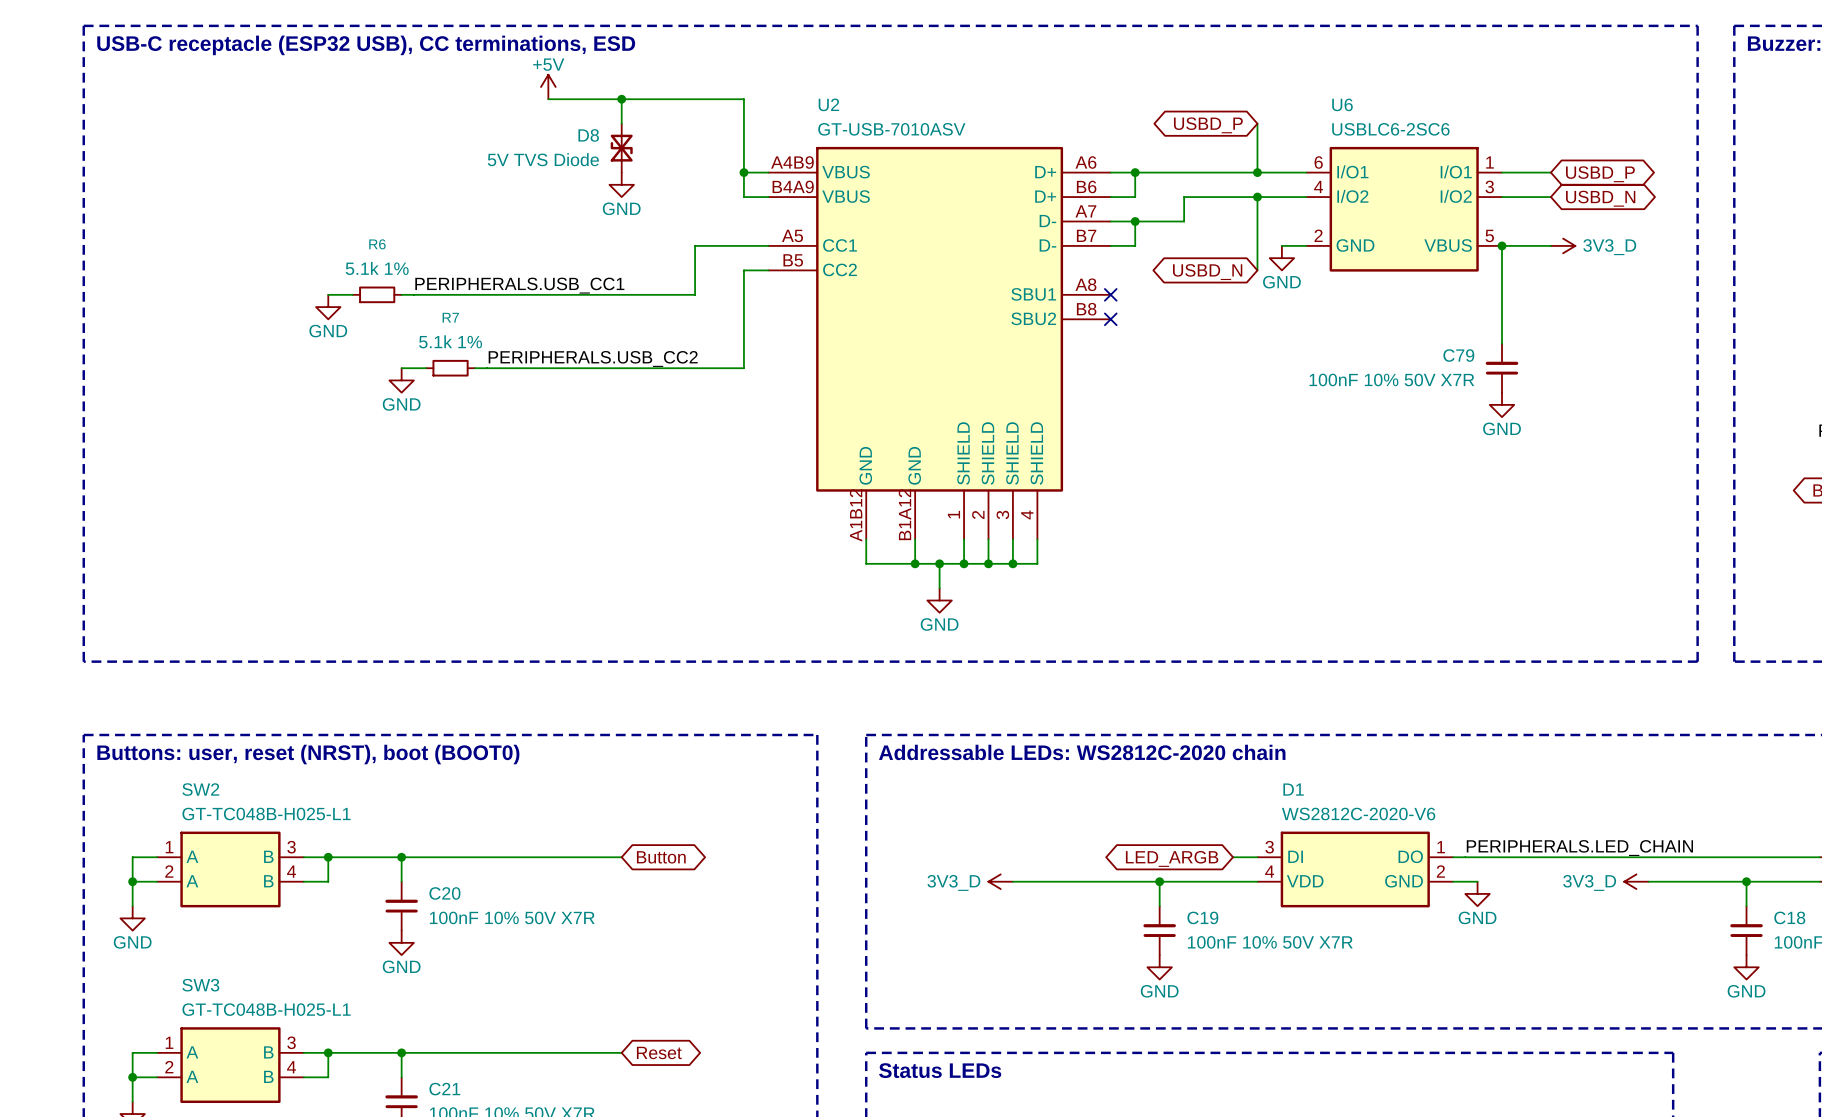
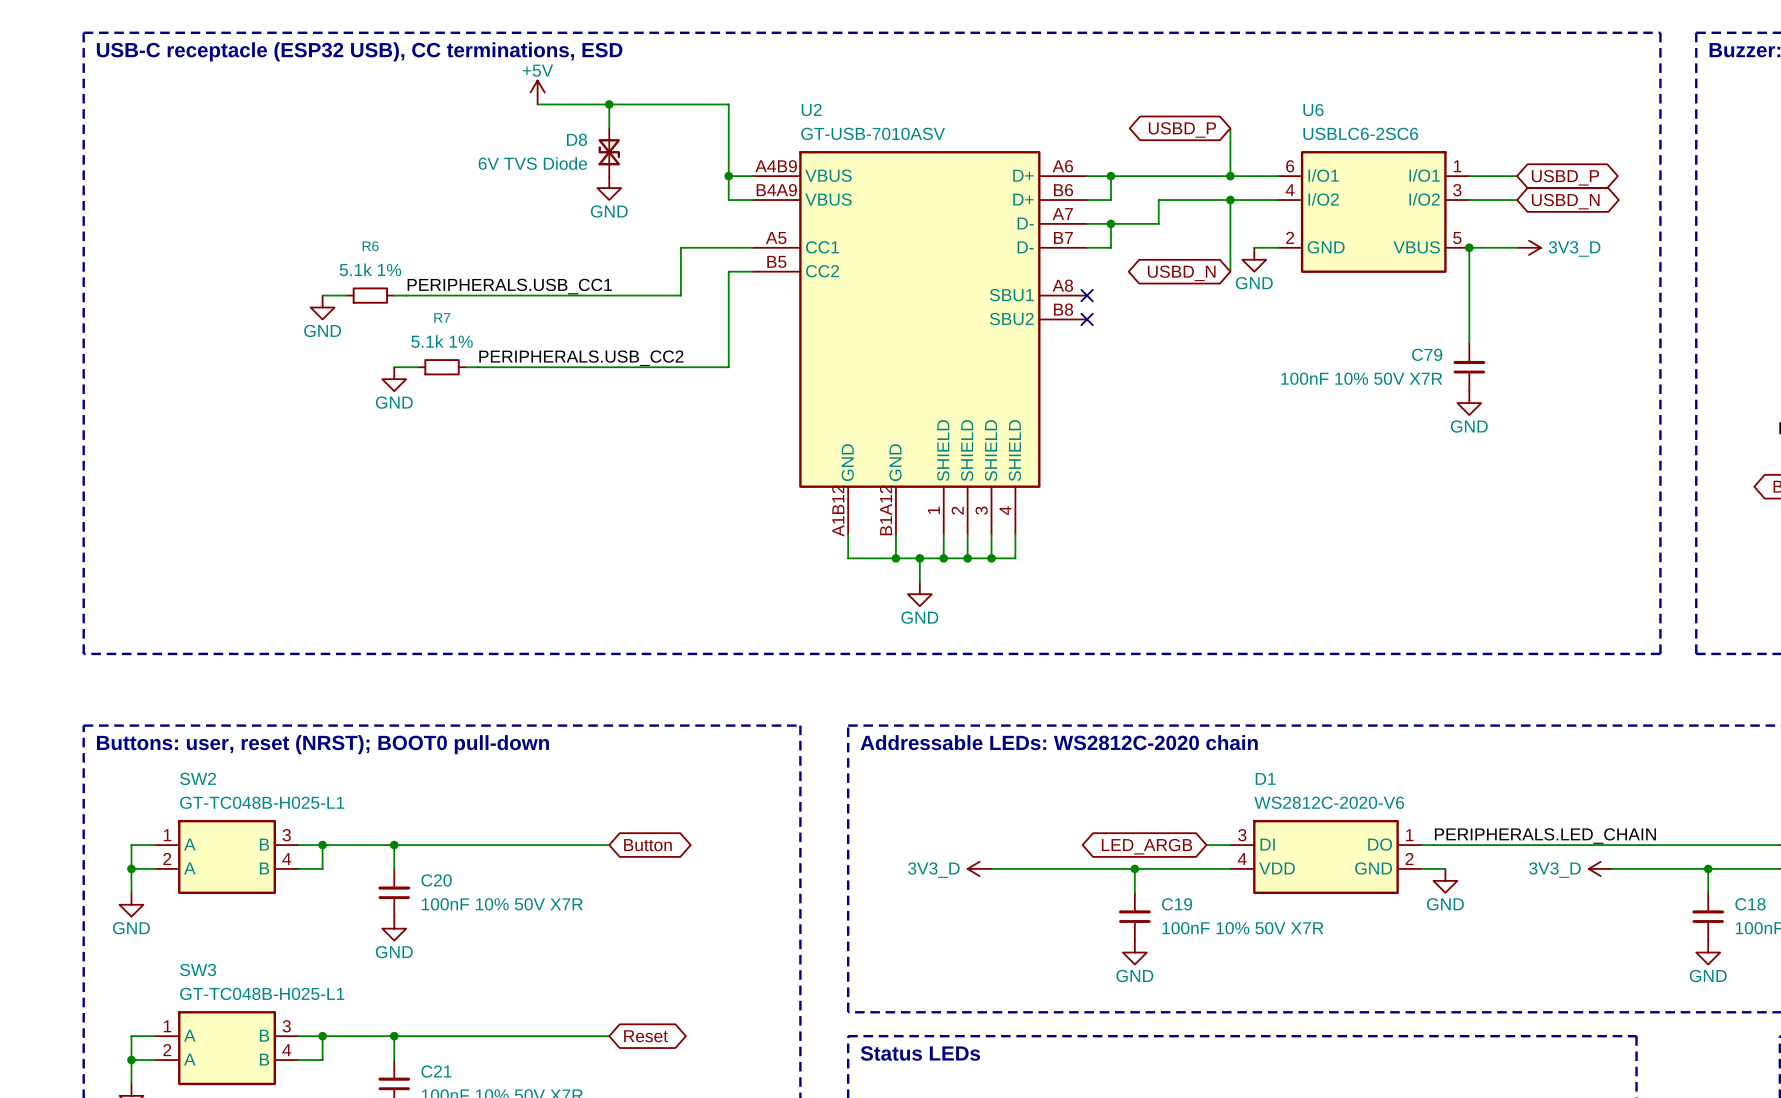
D8 value: 5V TVS Diode (543, 159) -> 6V TVS Diode (532, 163)
text: Buttons: user, reset (NRST), boot (BOOT0) (308, 754) -> Buttons: user, reset (NRST); BOOT0 pull-down (322, 744)

